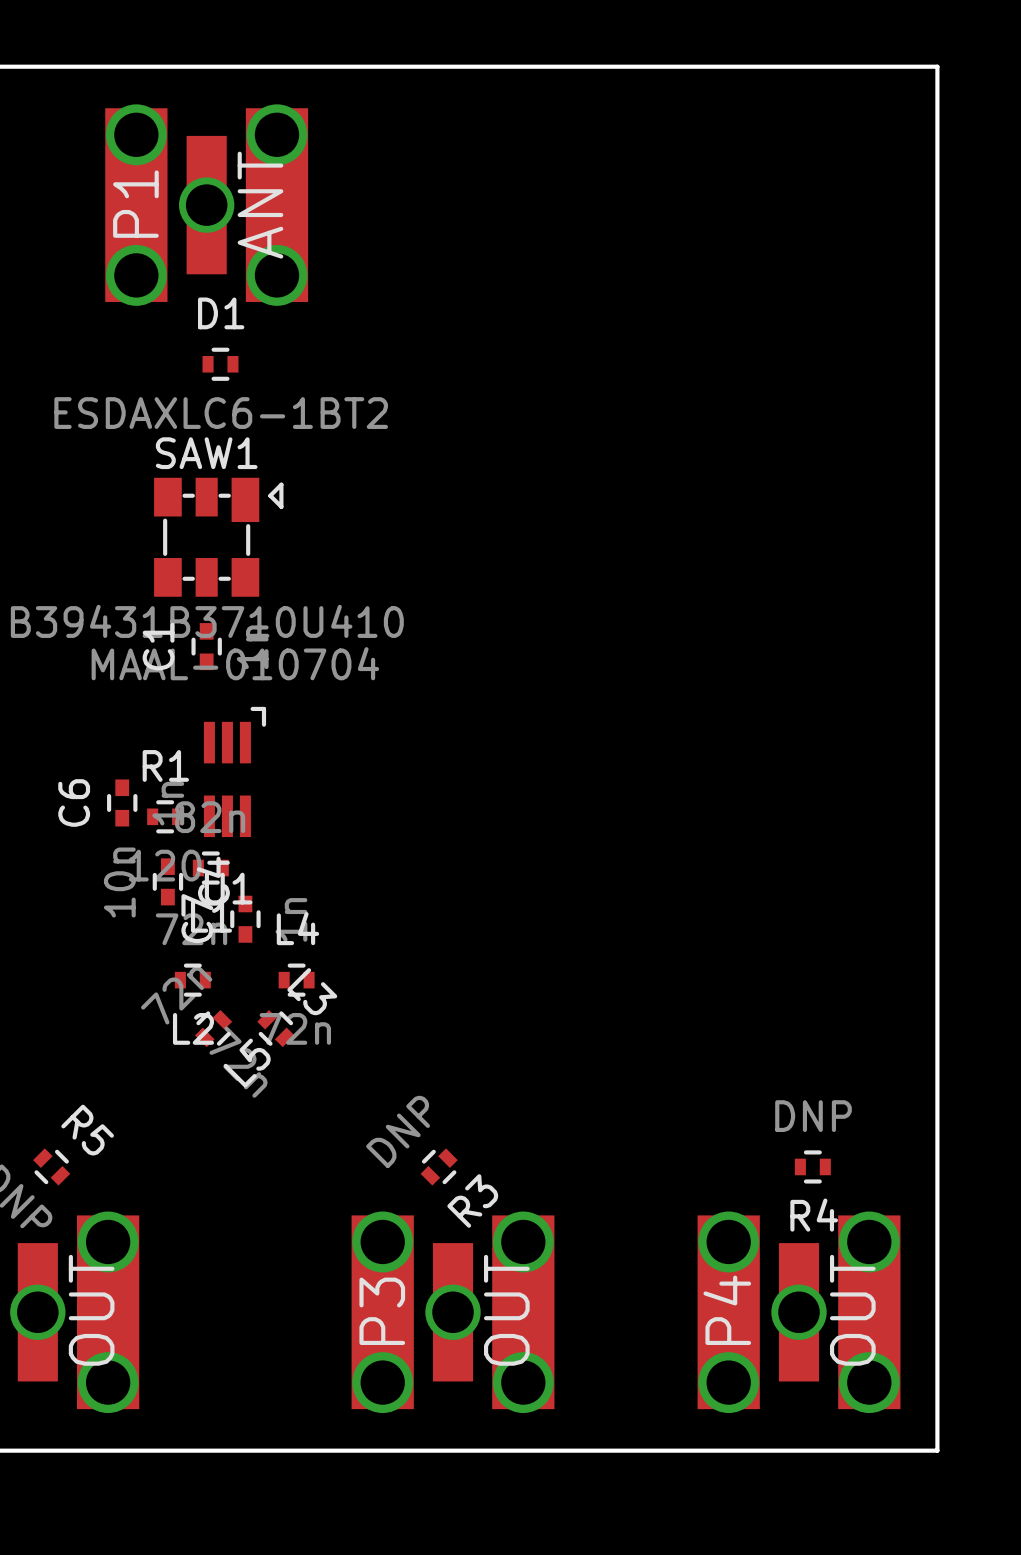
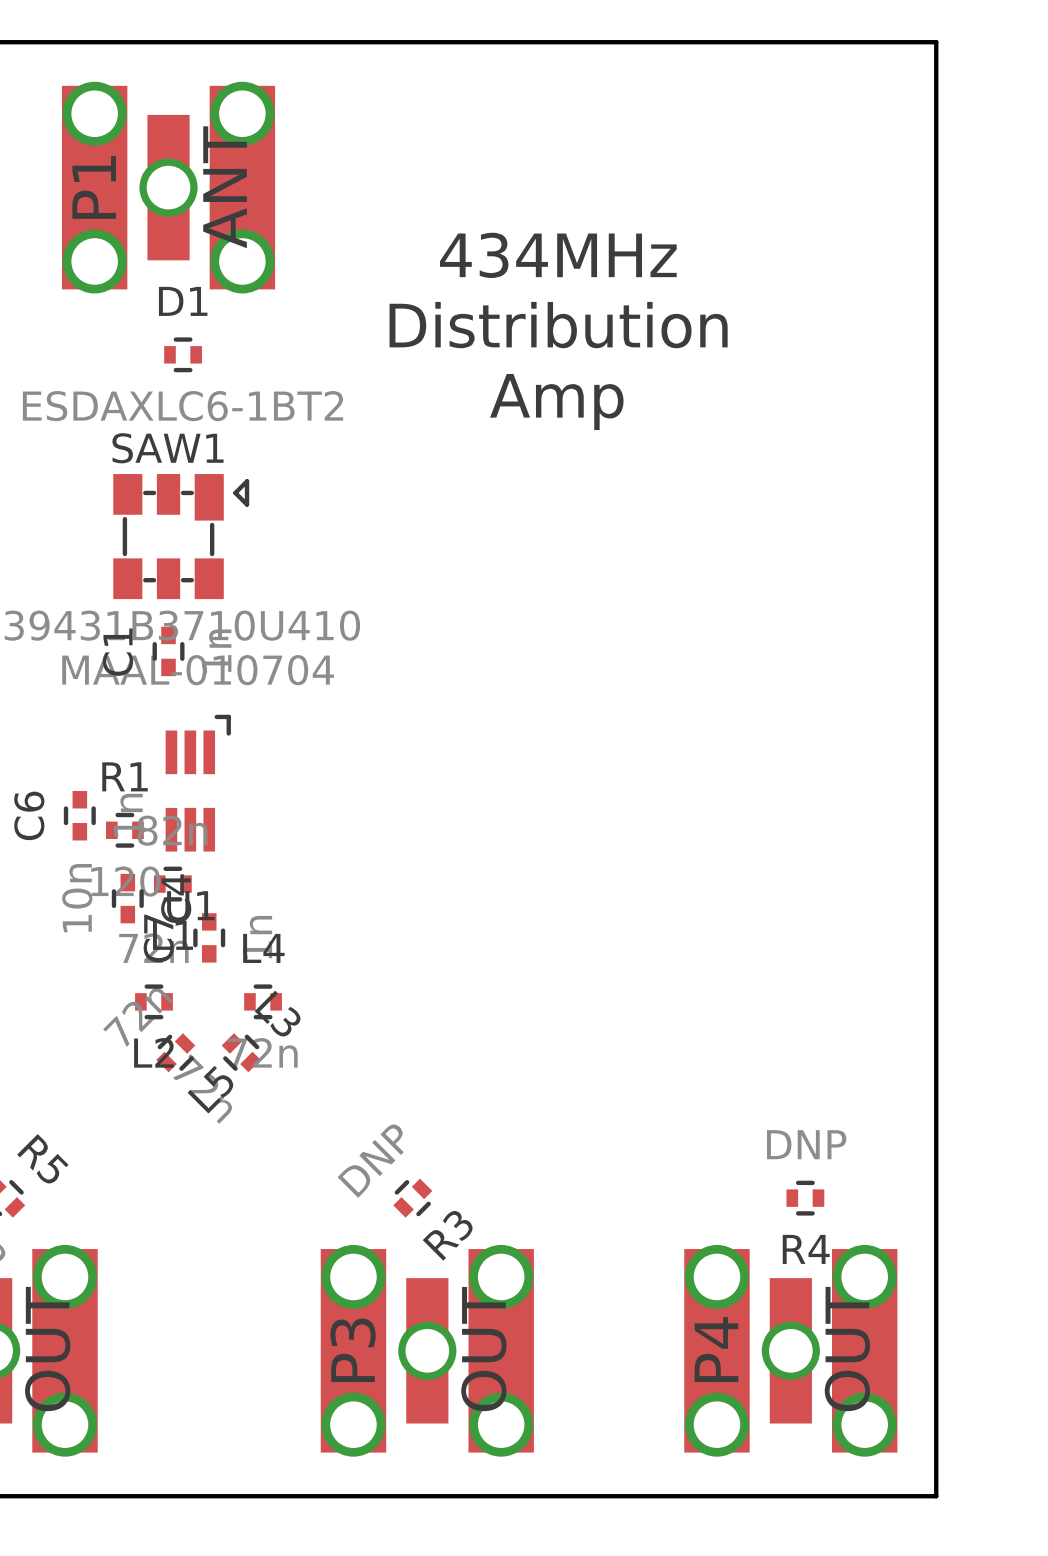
text: none -> 434MHz (558, 255)
text: none -> Distribution (558, 325)
text: none -> Amp (556, 402)

